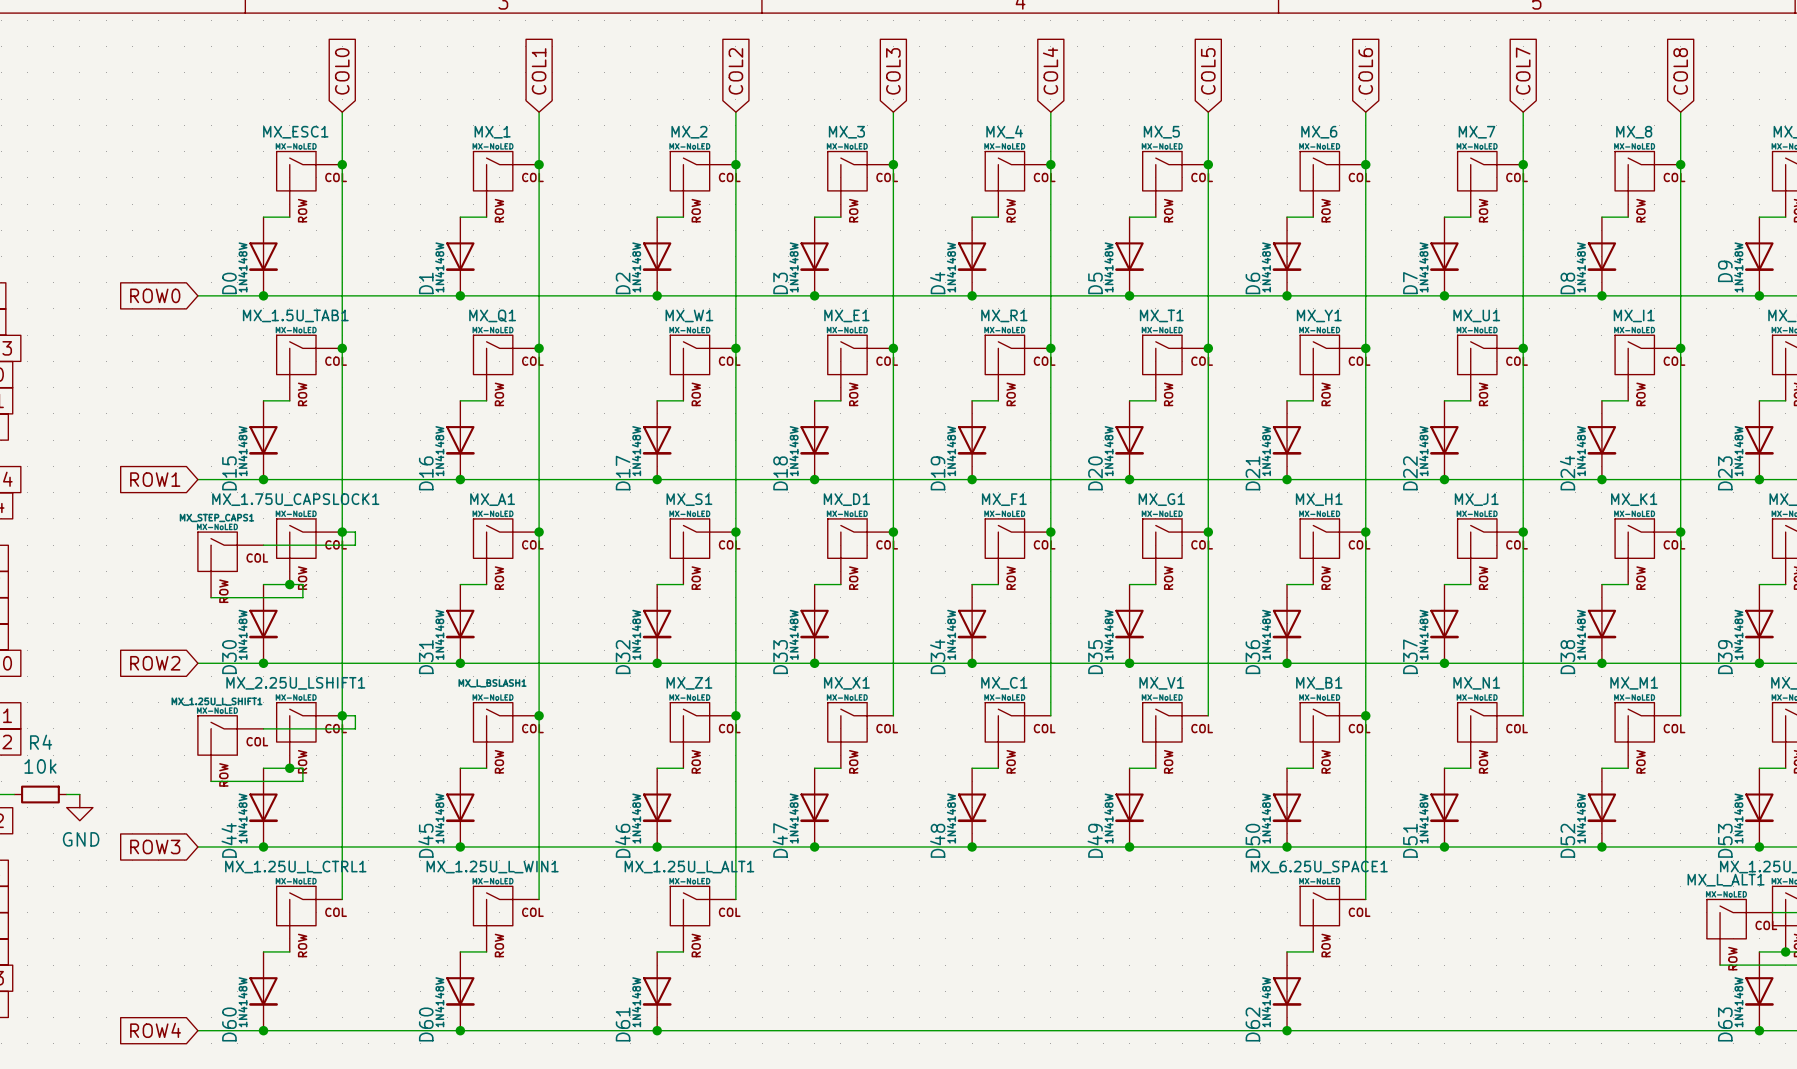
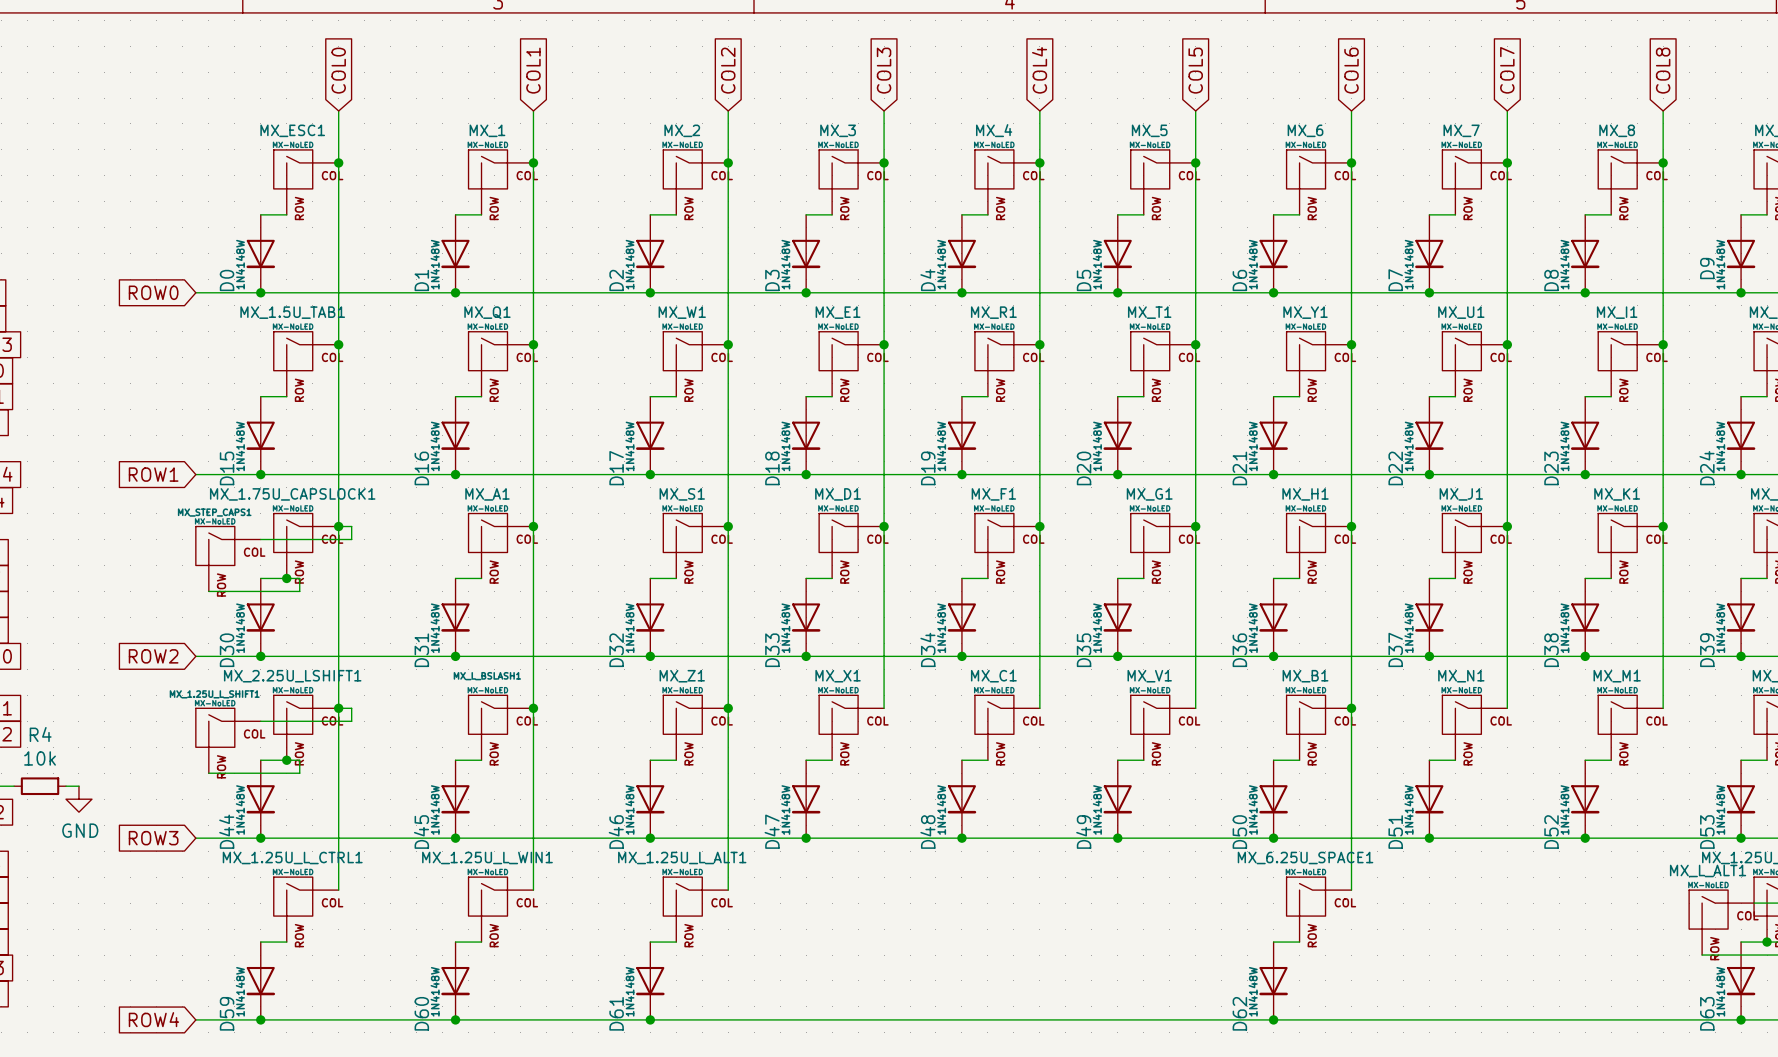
D24 name: D24 (1567, 473) -> D23 (1551, 468)
D23 name: D23 (1725, 473) -> D24 (1707, 468)
D60 name: D60 (229, 1024) -> D59 (227, 1013)

